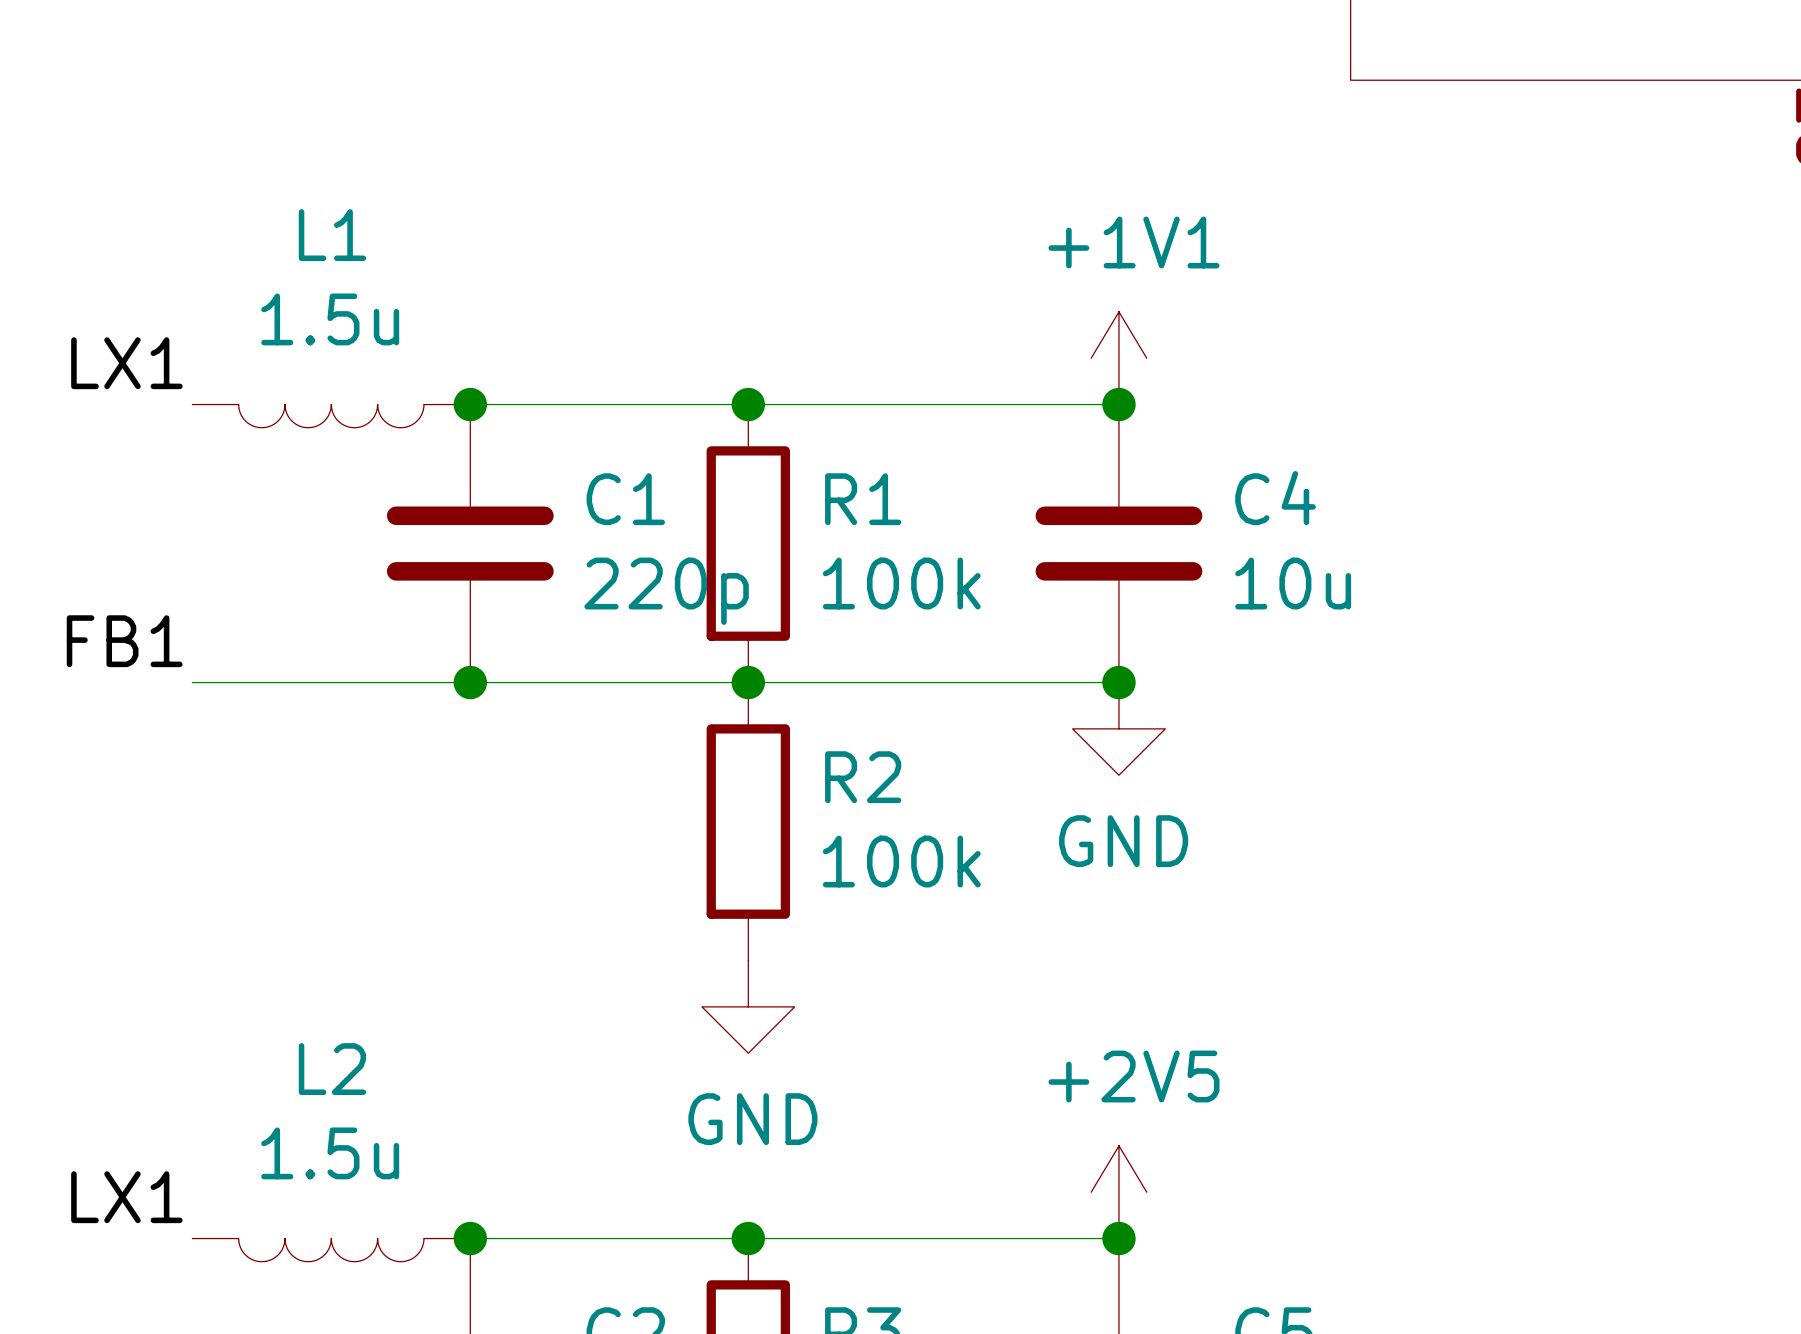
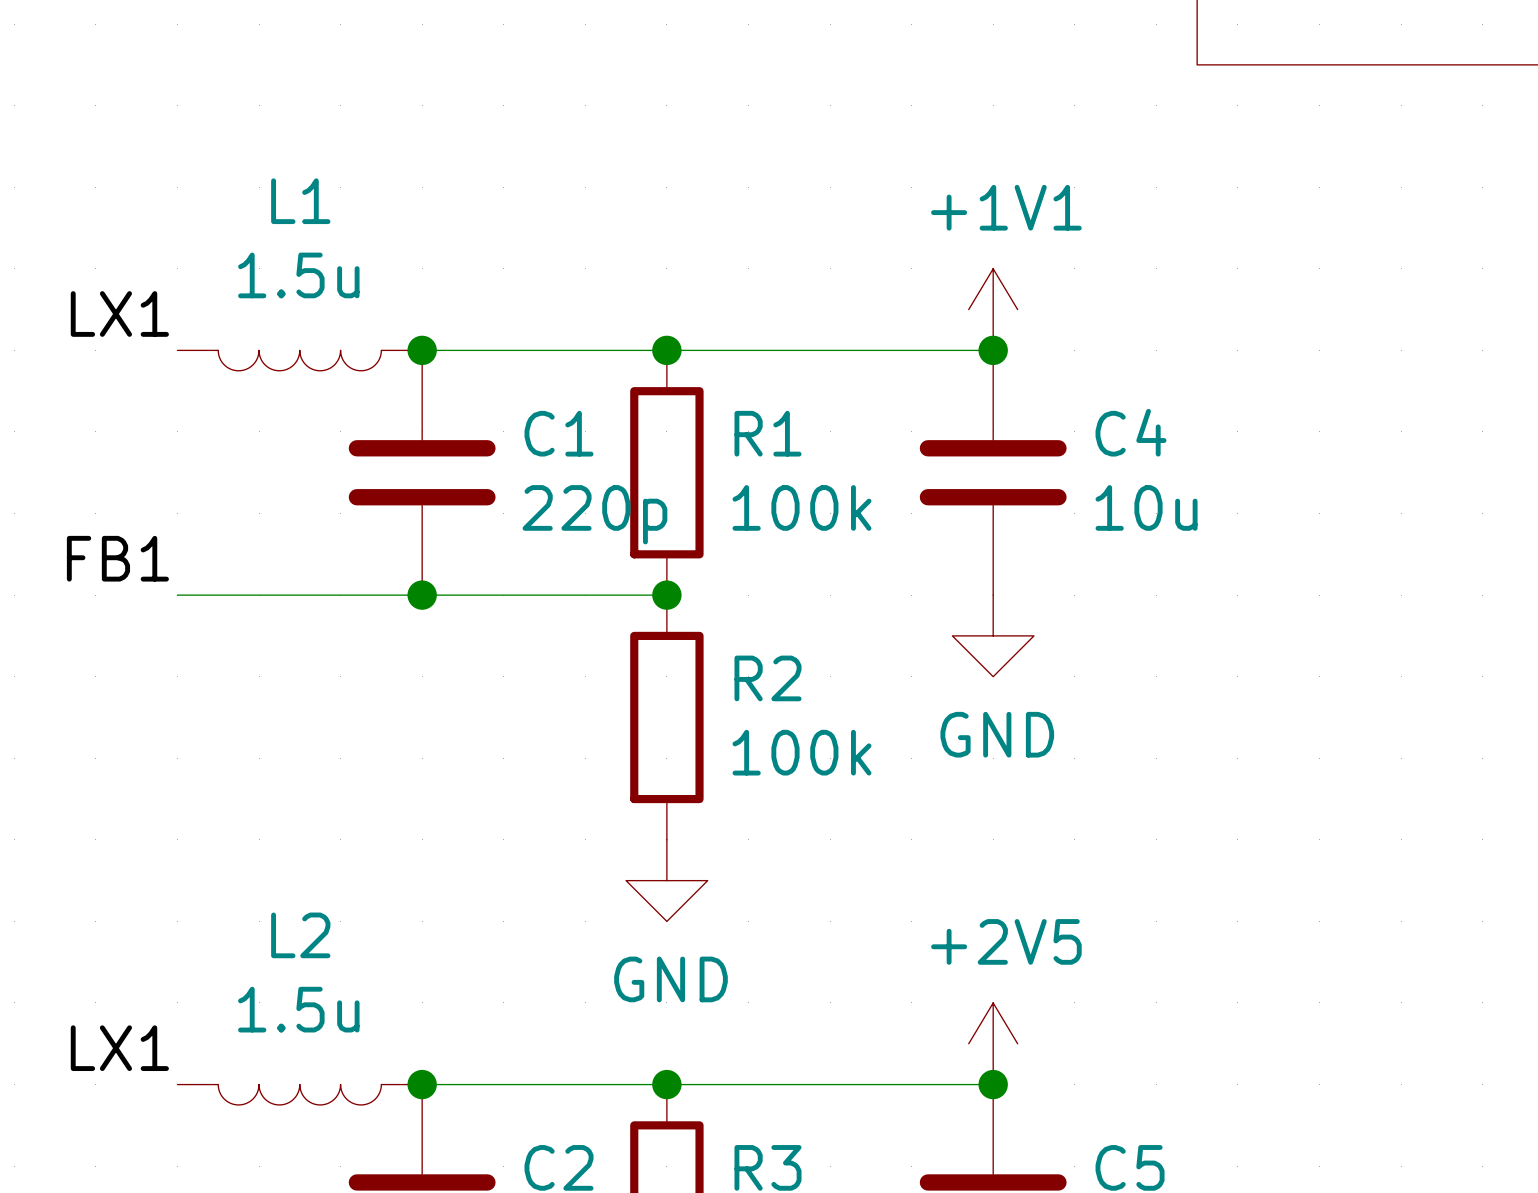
wire: (748, 682) (1118, 682) -> none
junction: (1118, 682) -> none

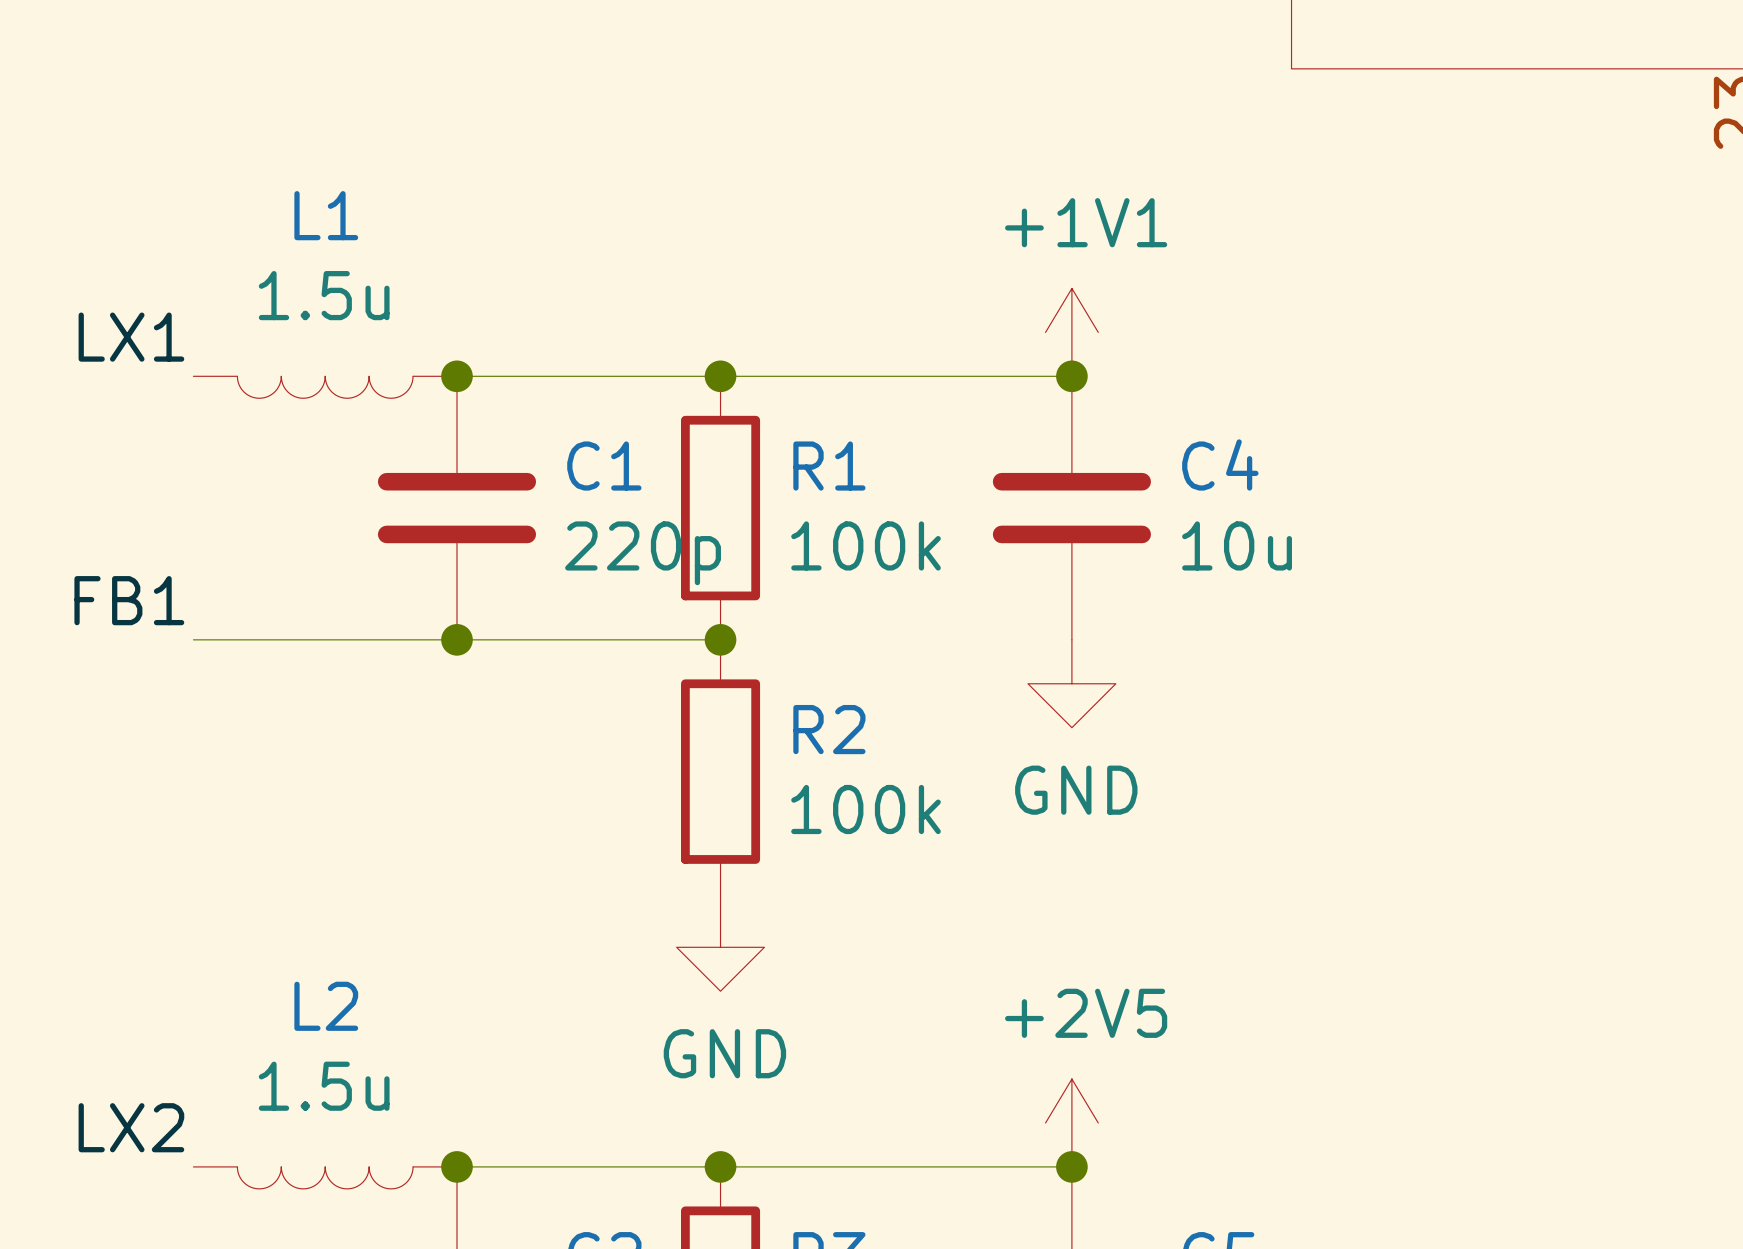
label: LX1 (119, 1048) -> LX2 (131, 1127)

